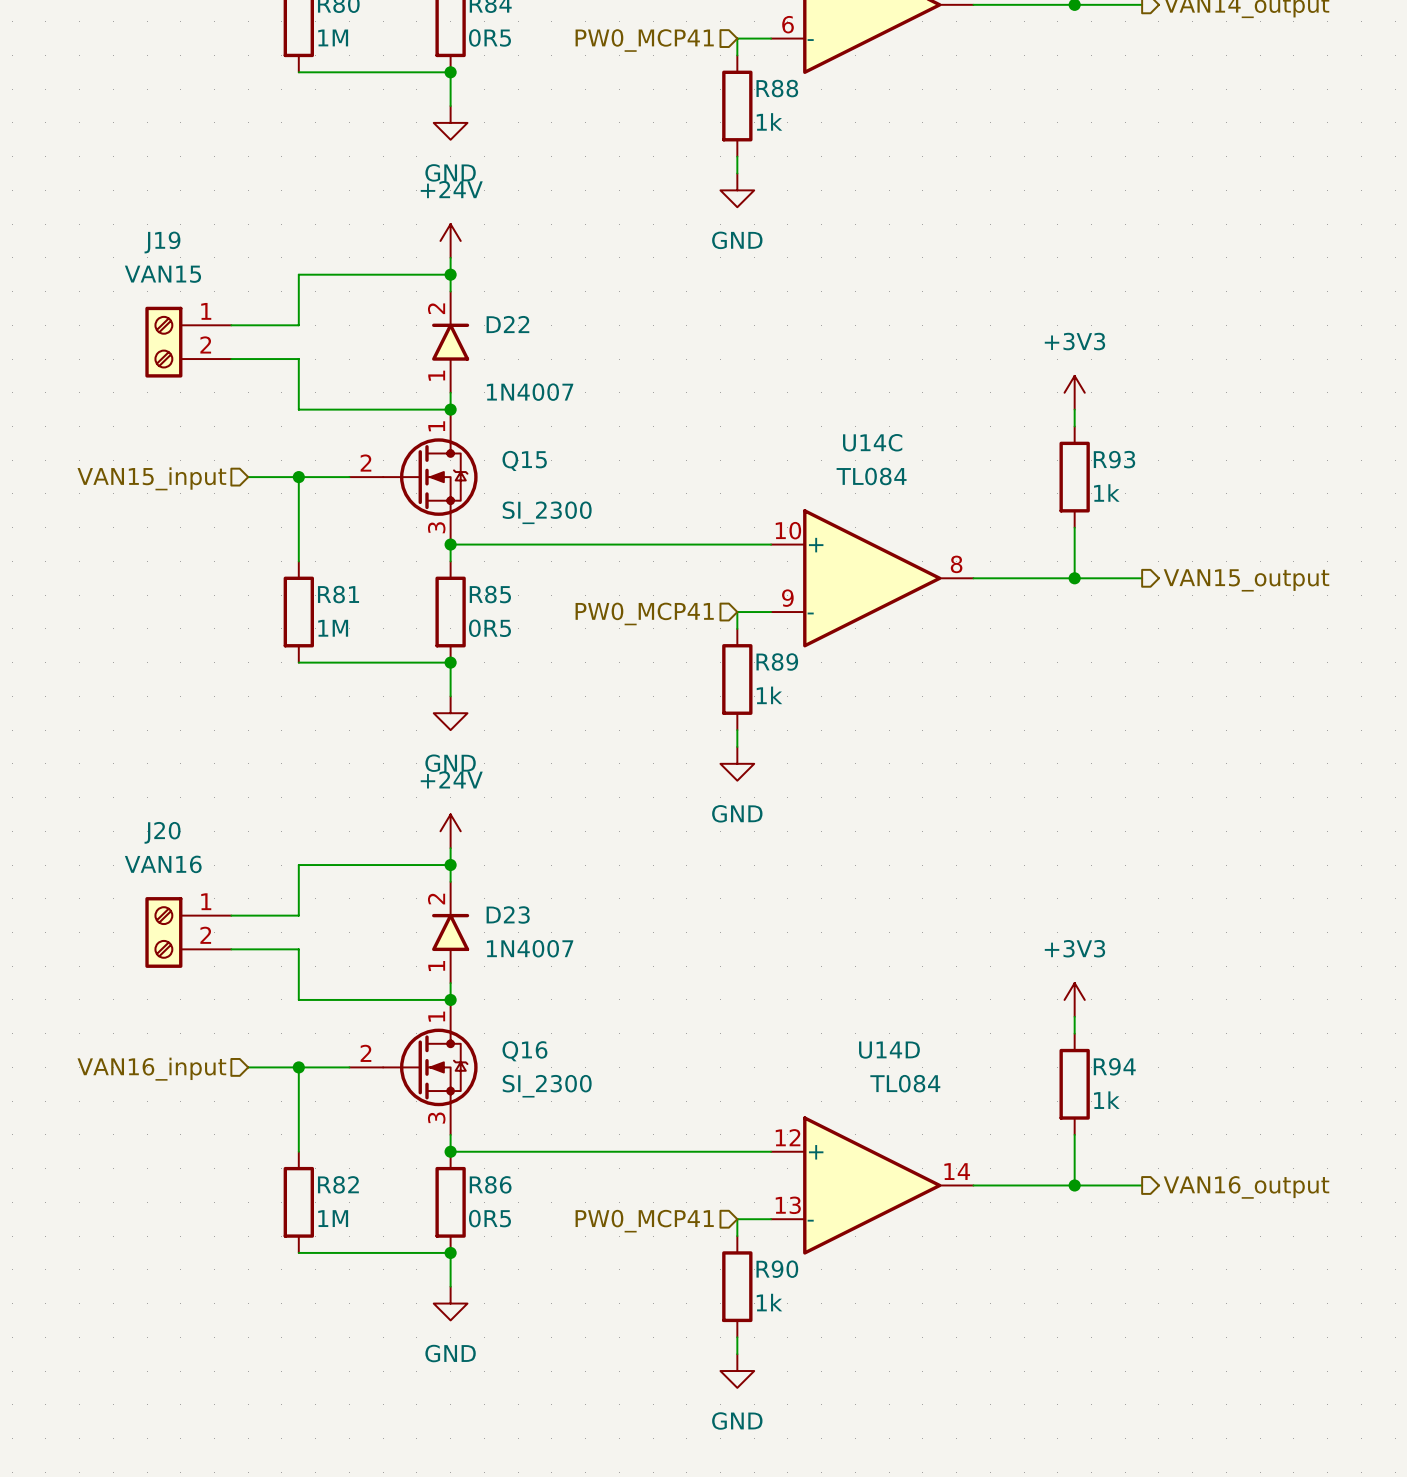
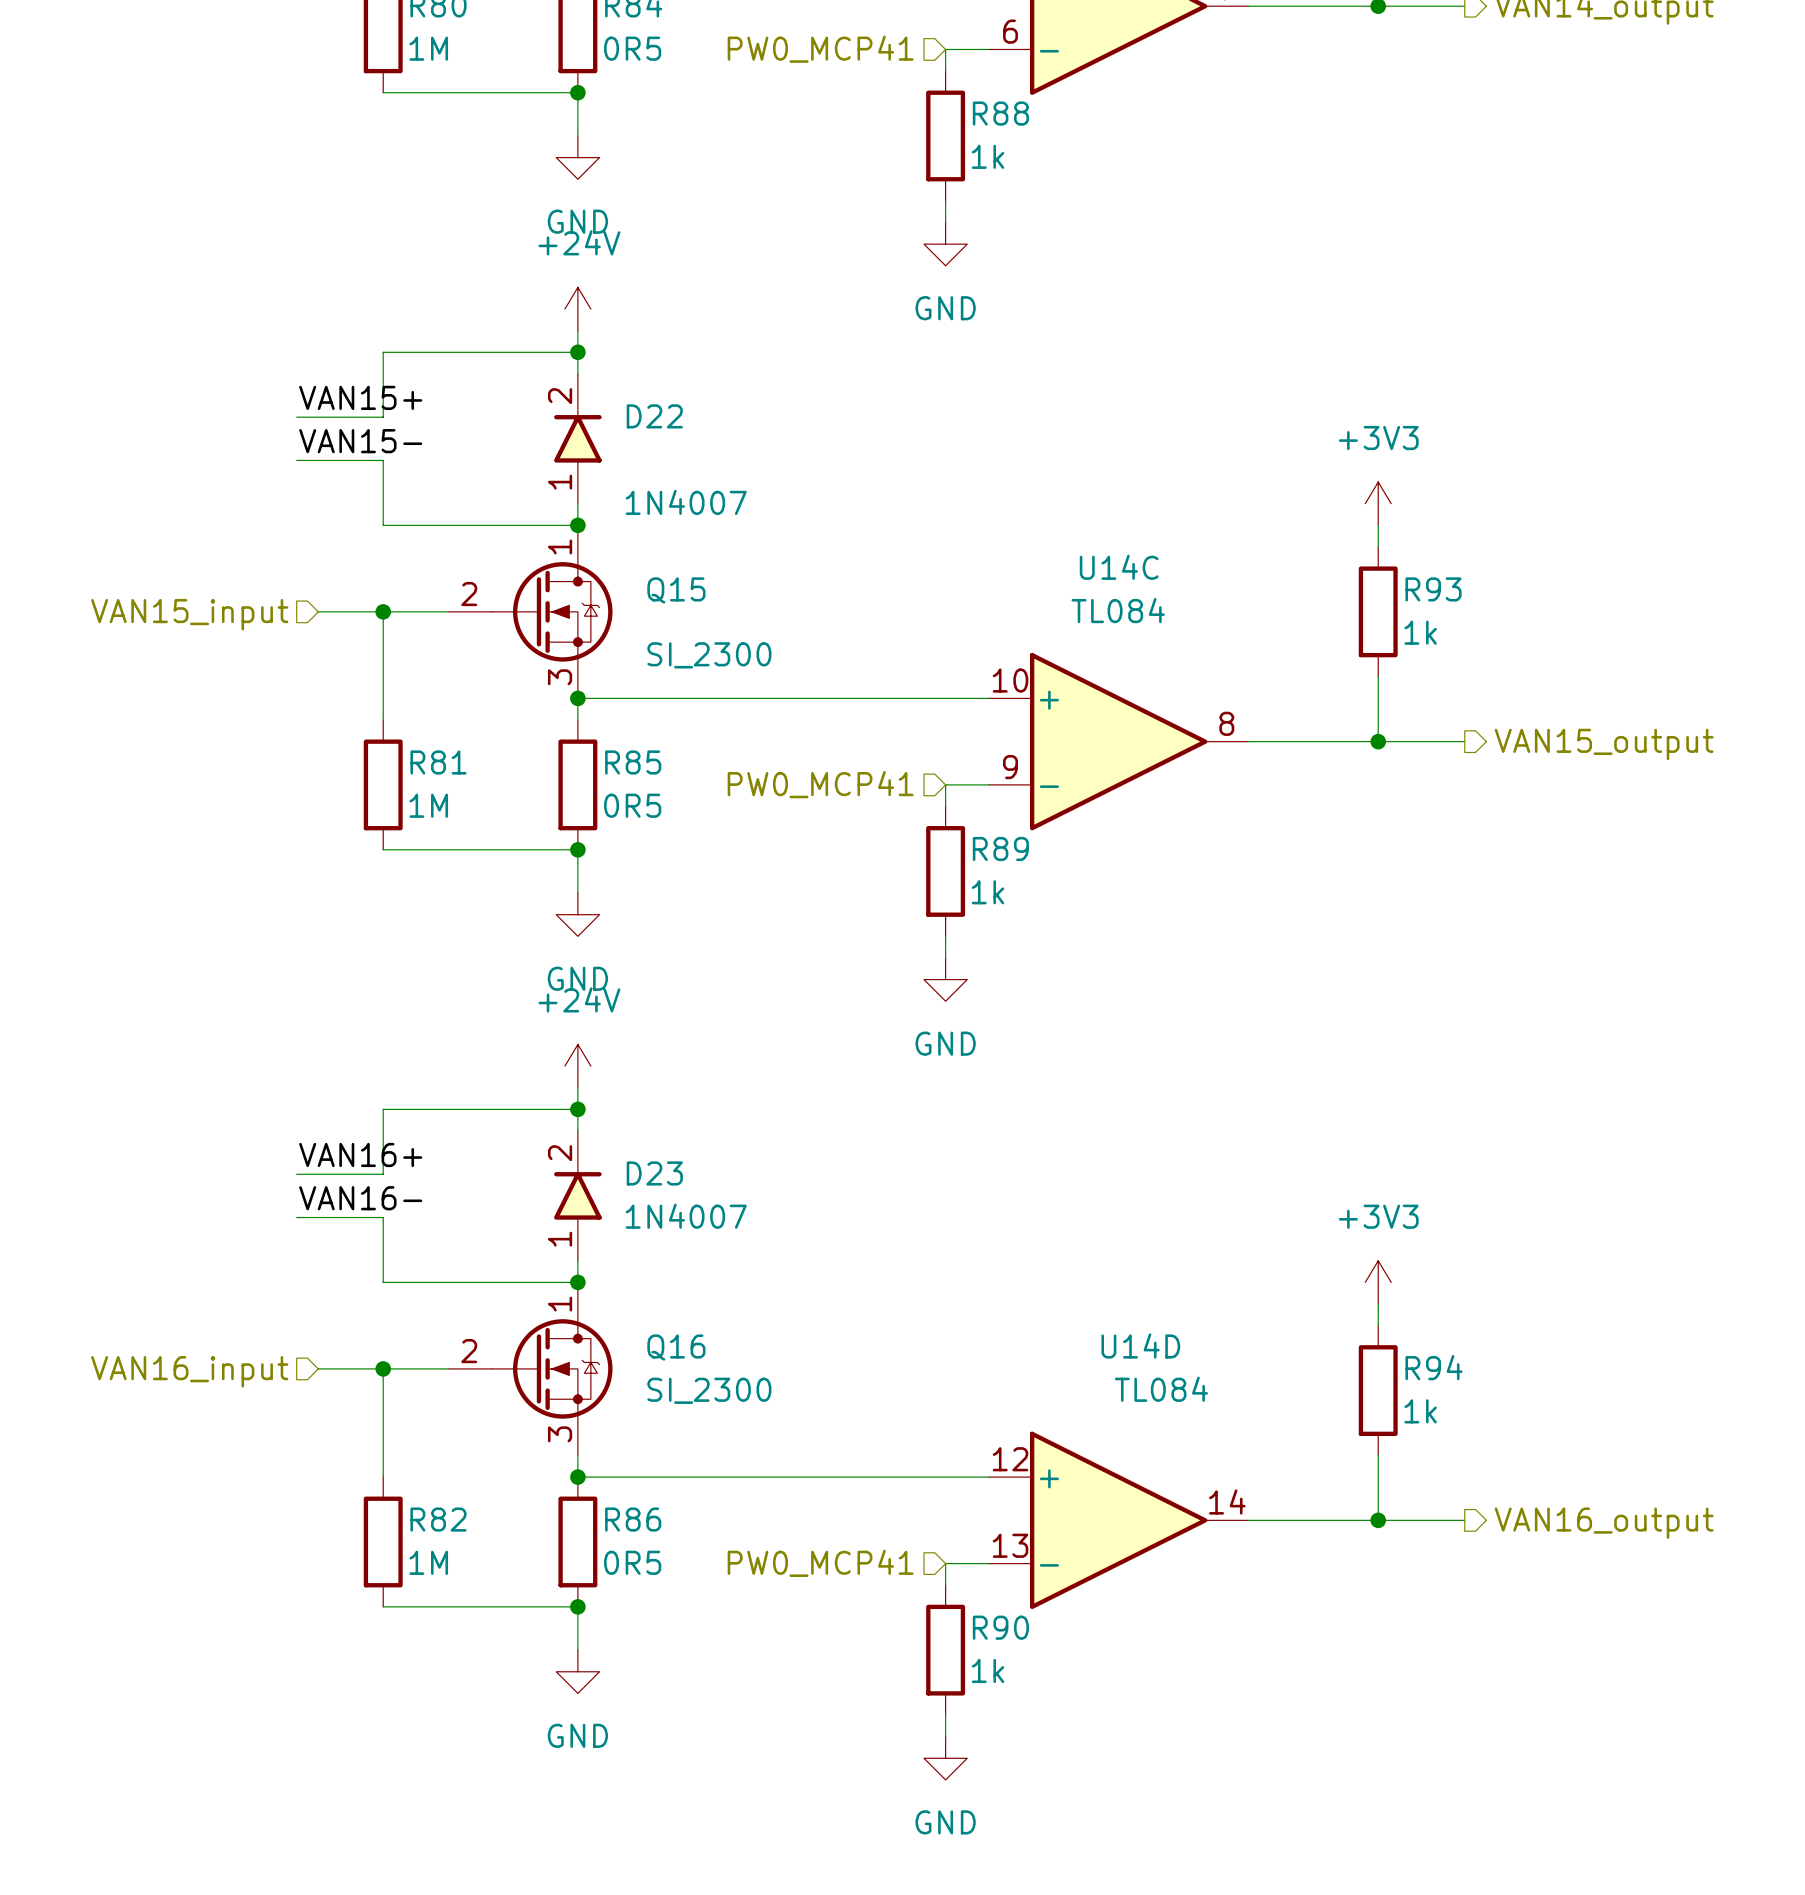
label: none -> VAN15+ (360, 397)
J19: VAN15 (188, 342) -> none
label: none -> VAN15- (360, 441)
label: none -> VAN16+ (360, 1154)
J20: VAN16 (188, 932) -> none
label: none -> VAN16- (360, 1198)

